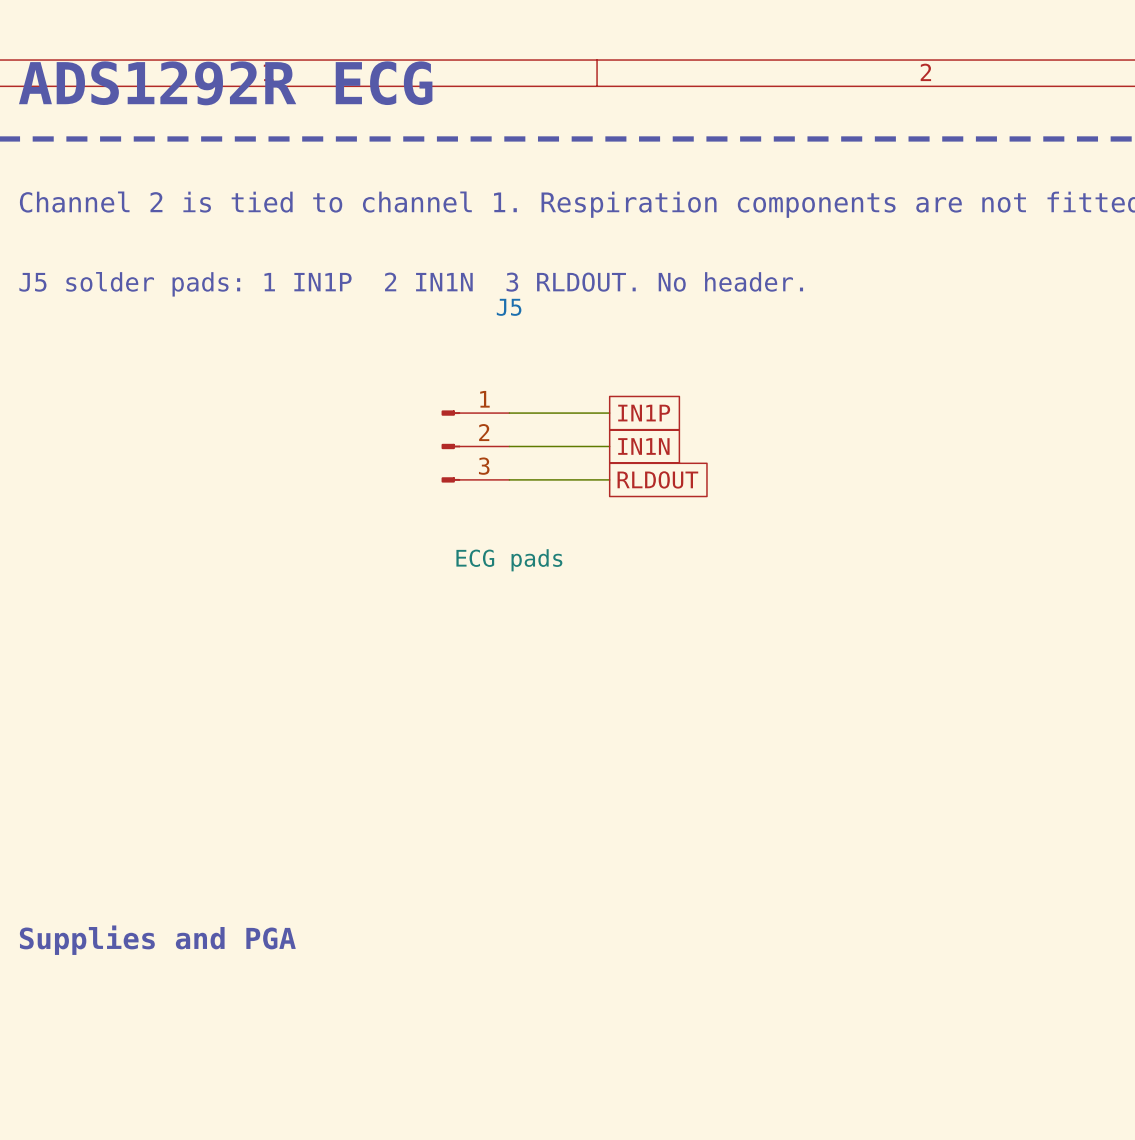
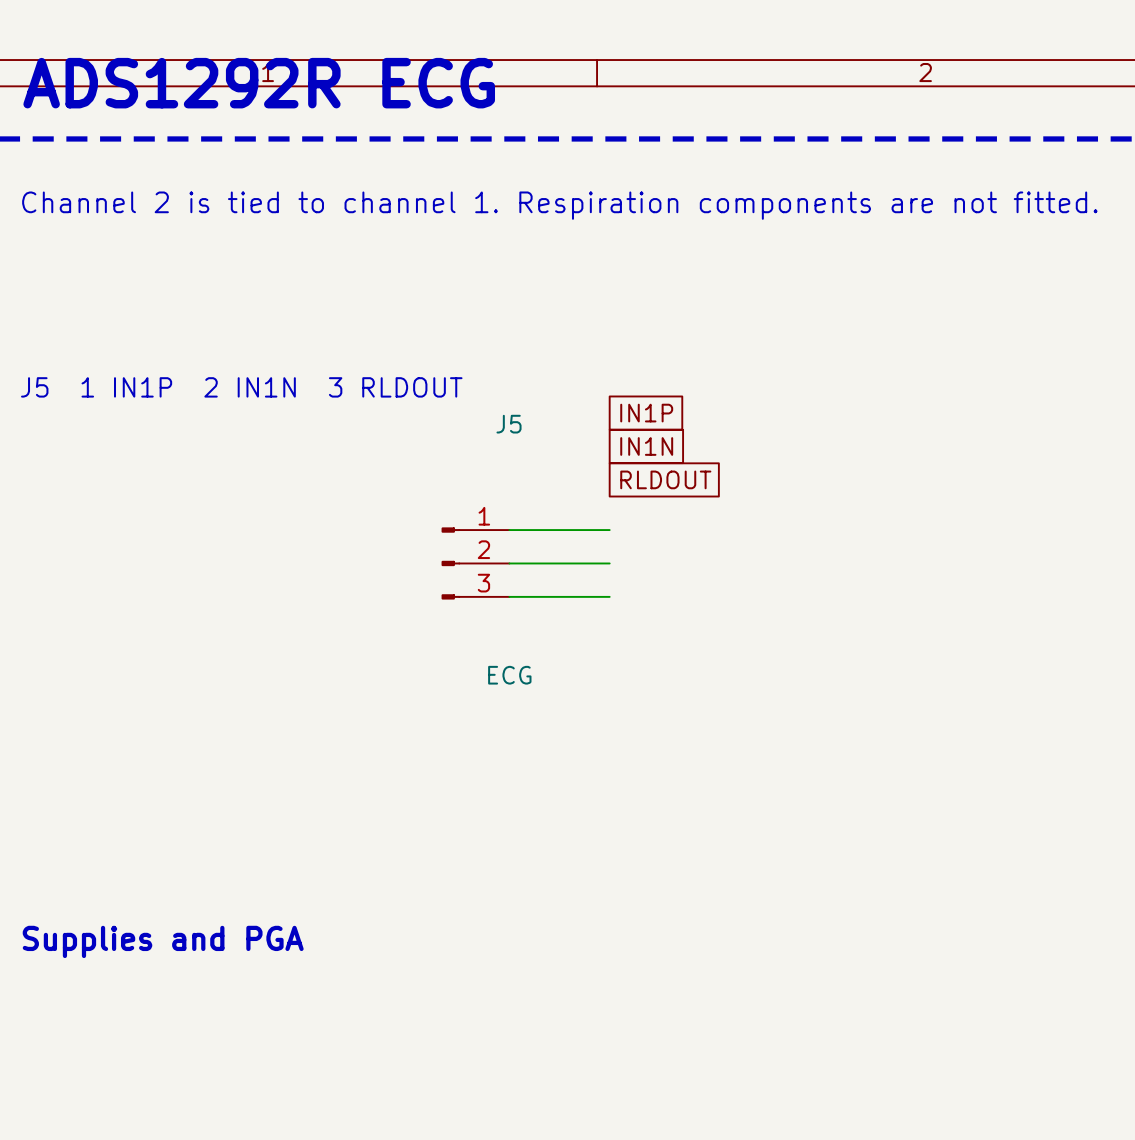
text: J5 solder pads: 1 IN1P 2 IN1N 3 RLDOUT. No header. (411, 284) -> none
text: none -> J5 1 IN1P 2 IN1N 3 RLDOUT (241, 387)
wire: (509, 413) (609, 413) -> (509, 530) (609, 530)
J5 position: (475, 446) -> (475, 563)
wire: (509, 446) (609, 446) -> (509, 563) (609, 563)
wire: (509, 479) (609, 479) -> (509, 596) (609, 596)
J5 value: ECG pads (509, 560) -> ECG (509, 675)

